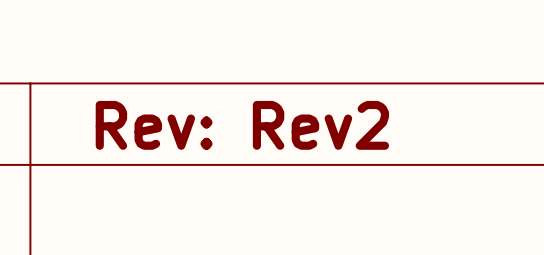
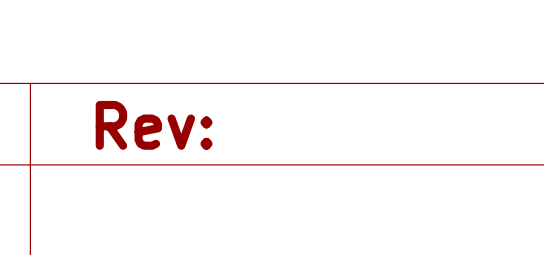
title block: Rev: Rev2 (242, 125) -> Rev: (154, 125)

